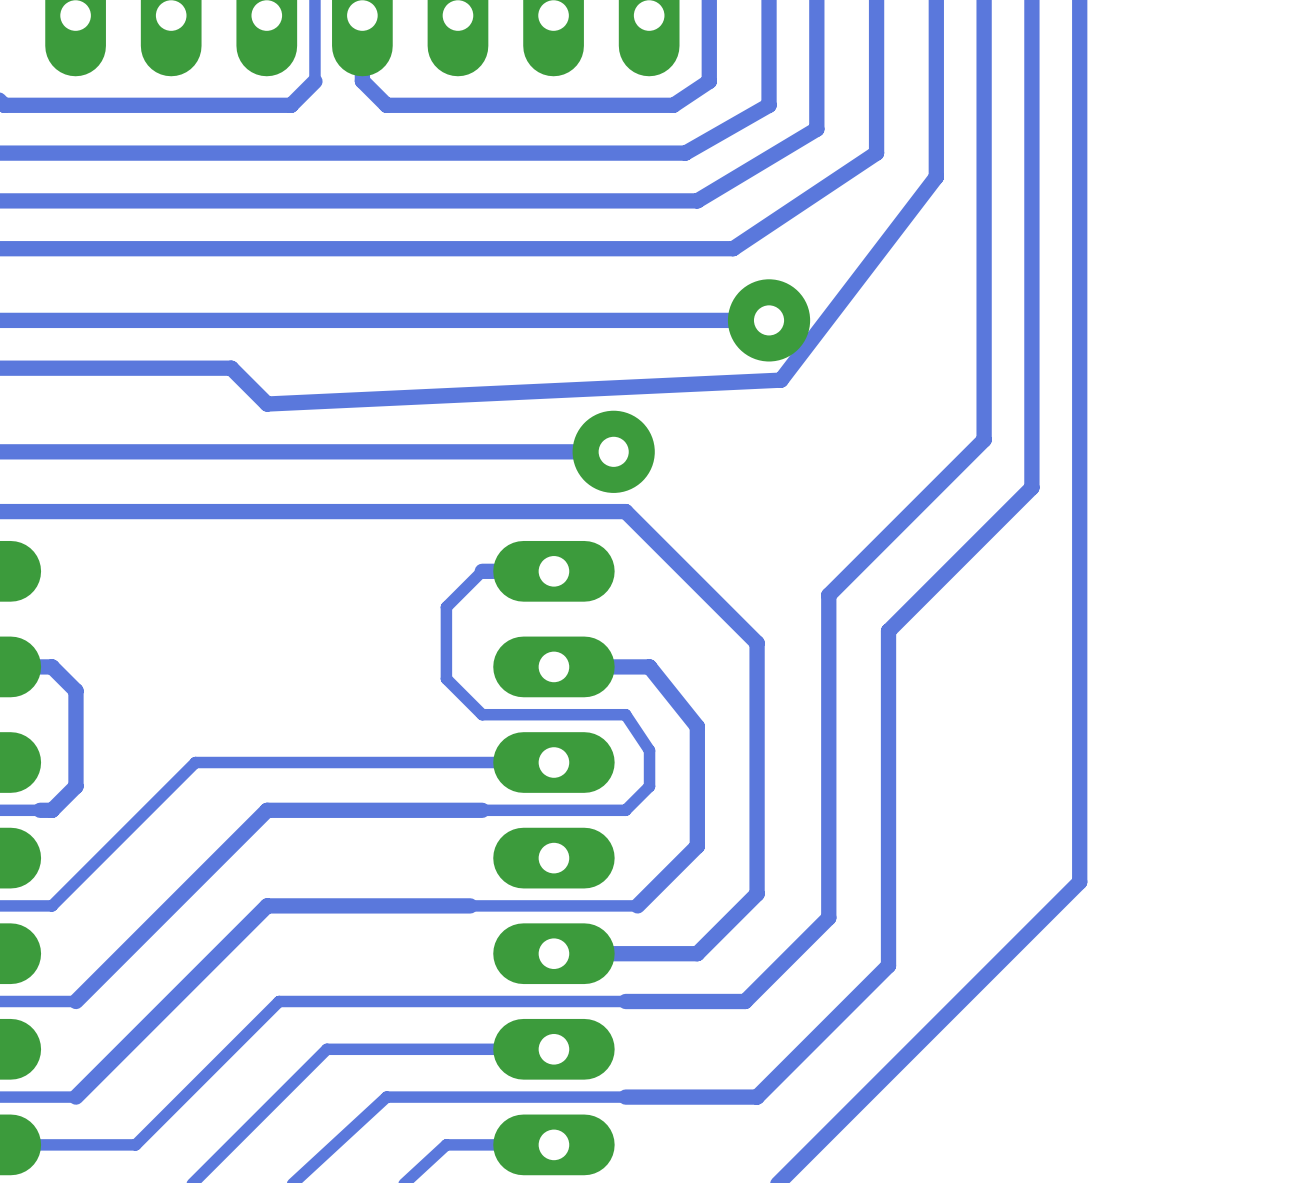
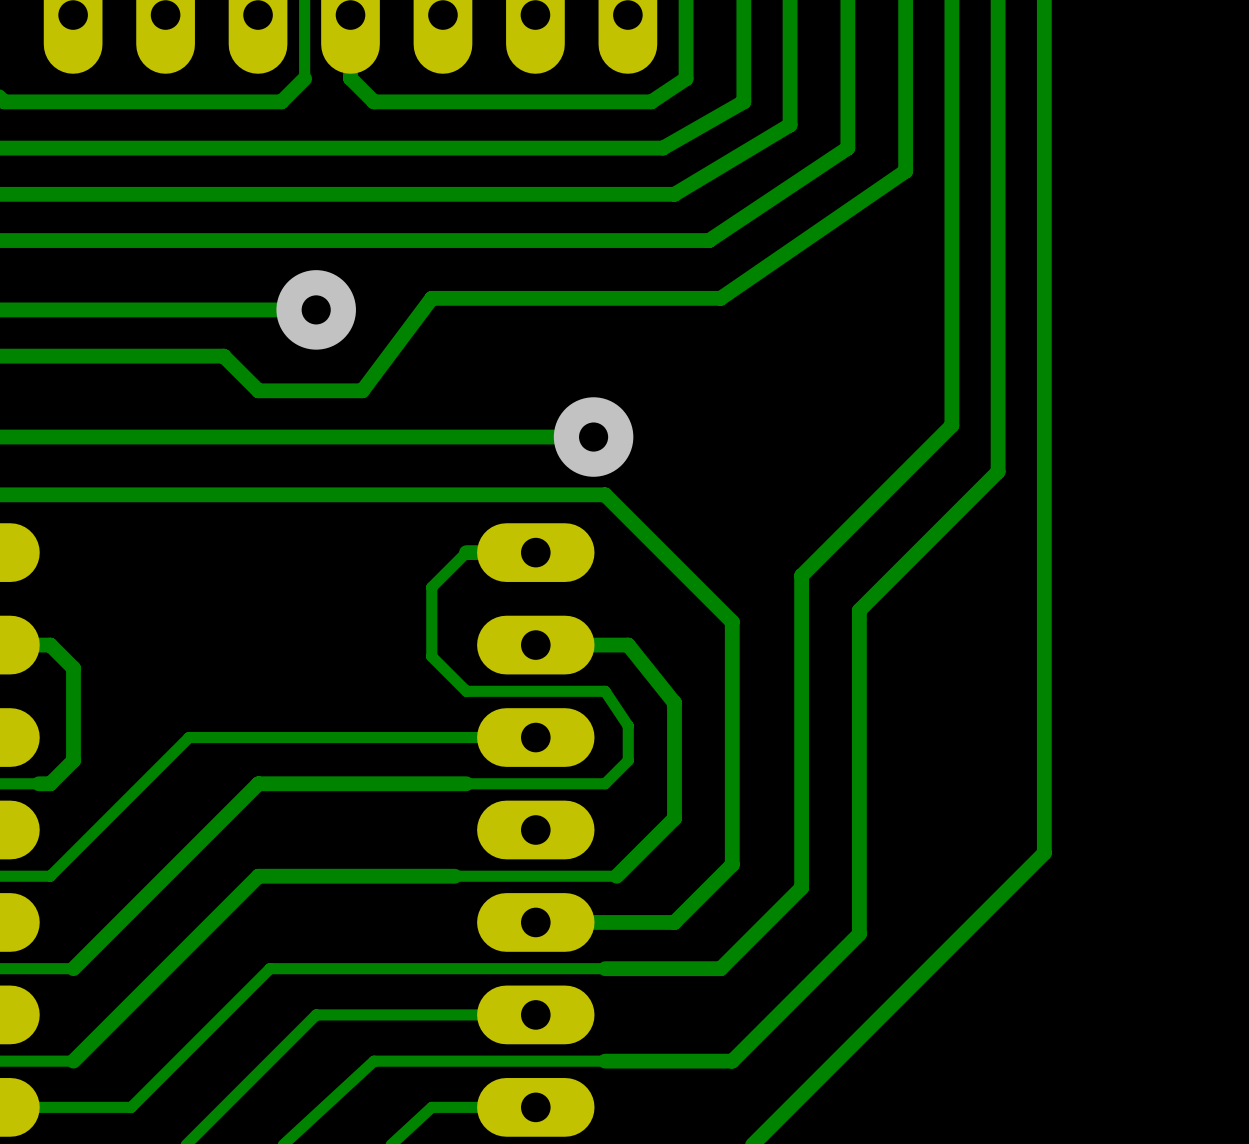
track: (936, 177) (780, 380) (267, 404) -> (905, 171) (720, 298) (431, 298) (362, 390) (258, 390)
via: none -> (316, 309)
track: (769, 320) (326, 320) -> none
via: (769, 320) -> none

